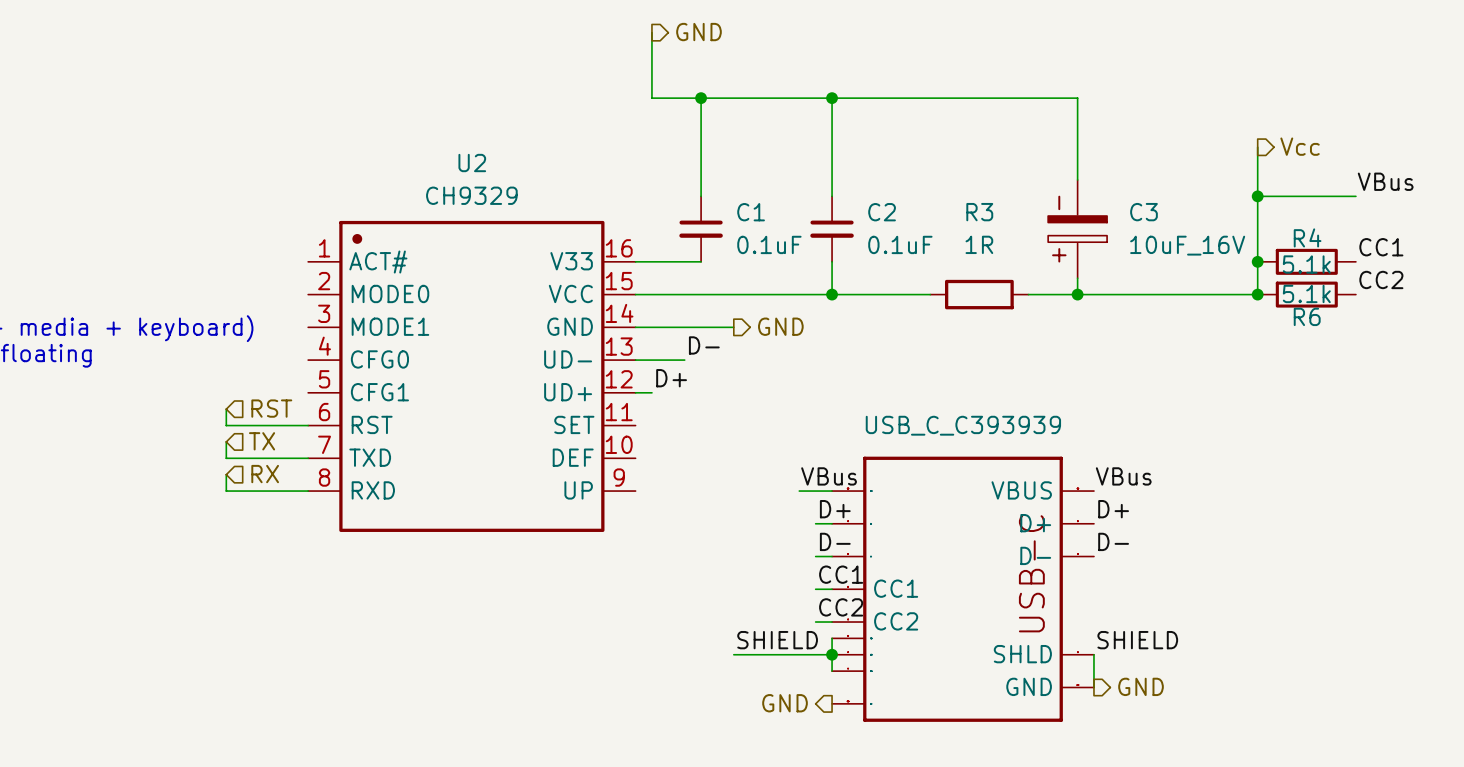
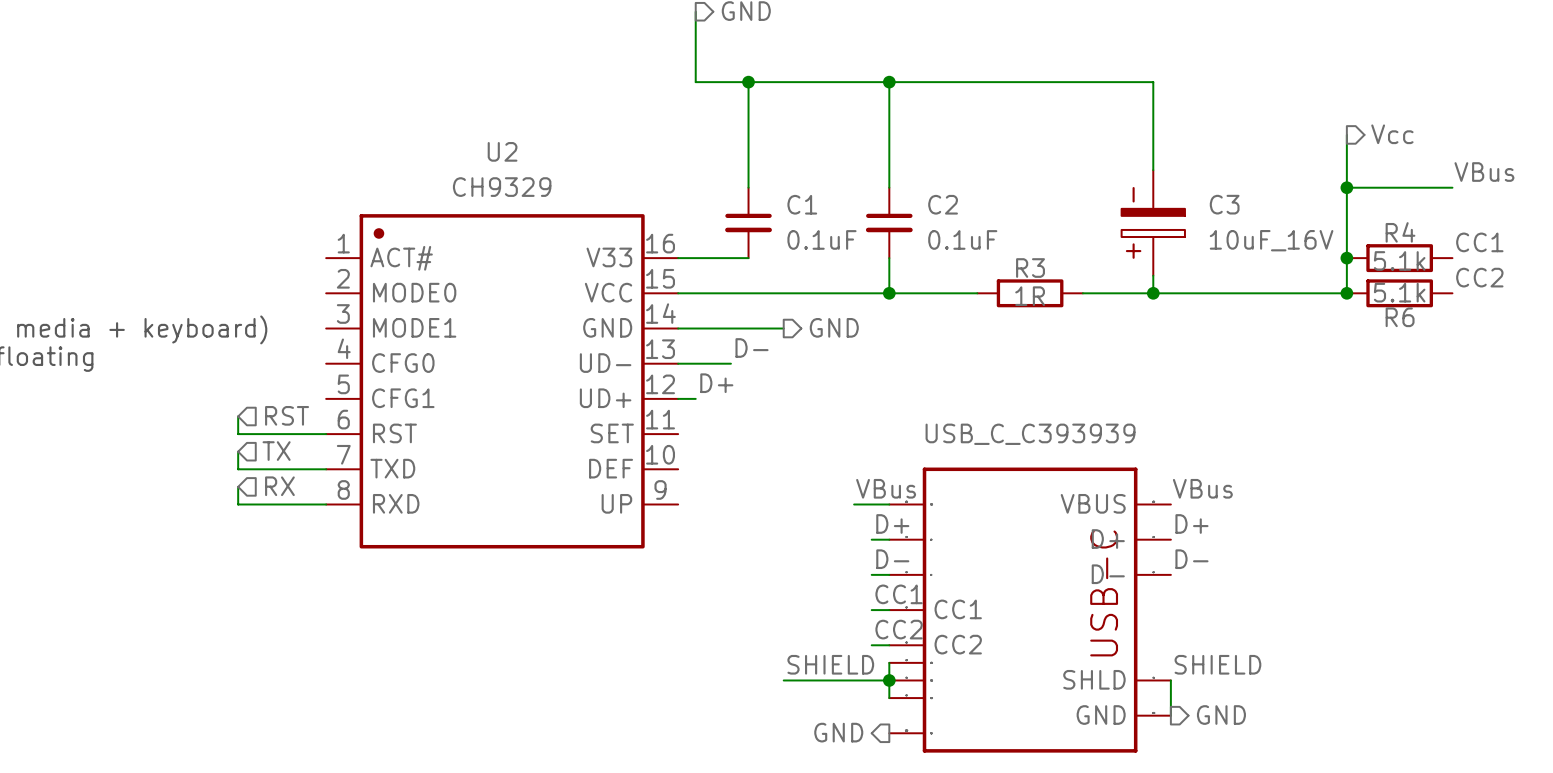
R3 name position: R3 (979, 212) -> R3 (1030, 268)
R3 text: 1R (979, 244) -> none
R3 symbol: [930, 279, 1029, 310] -> [977, 279, 1083, 308]
R3 value: none -> 1R (1030, 296)

